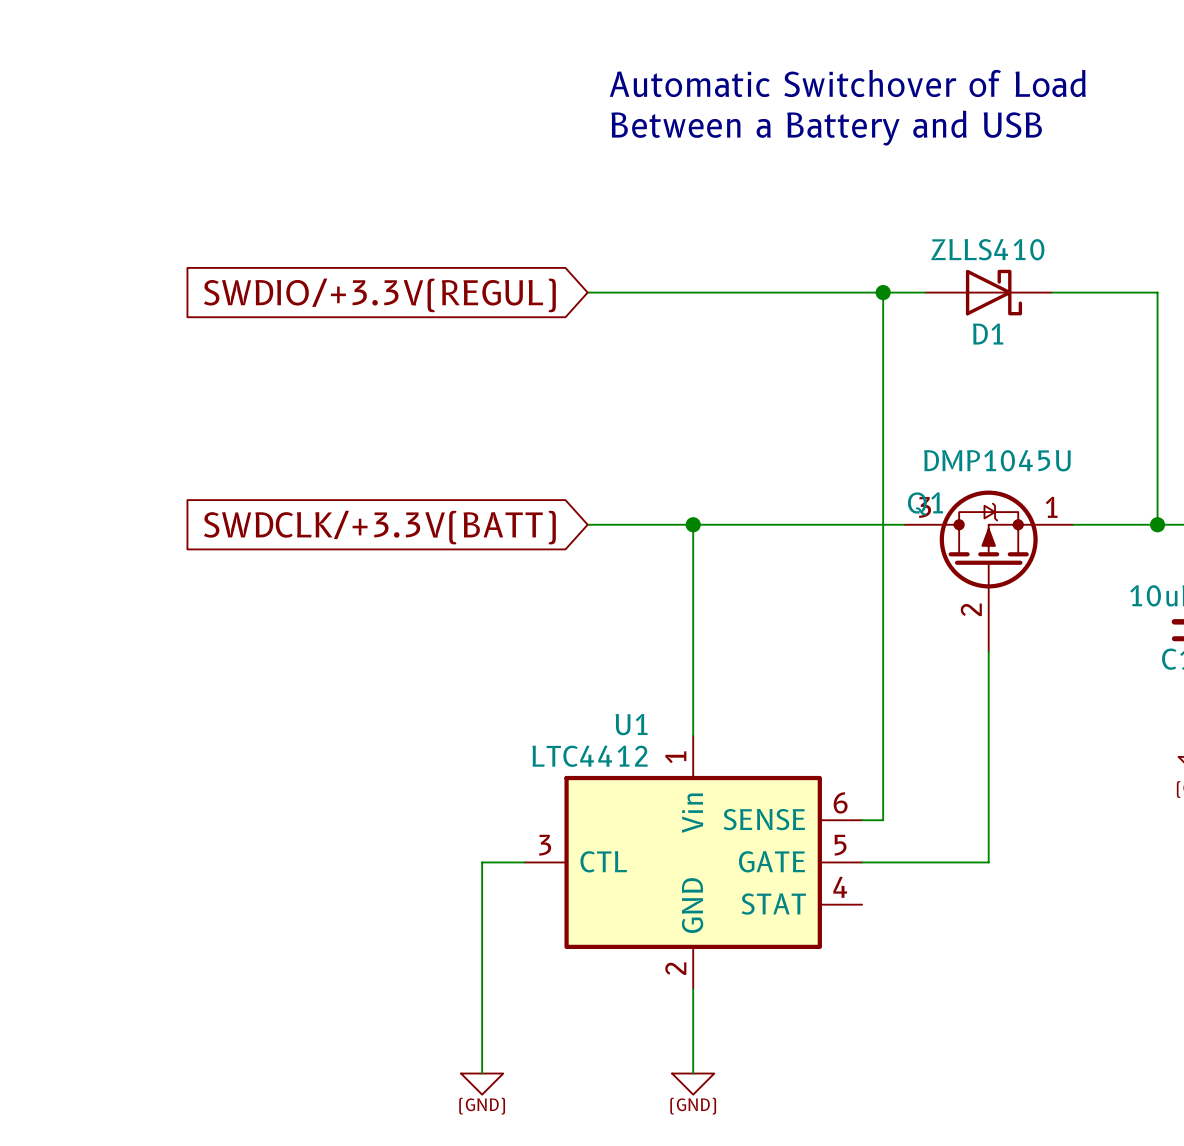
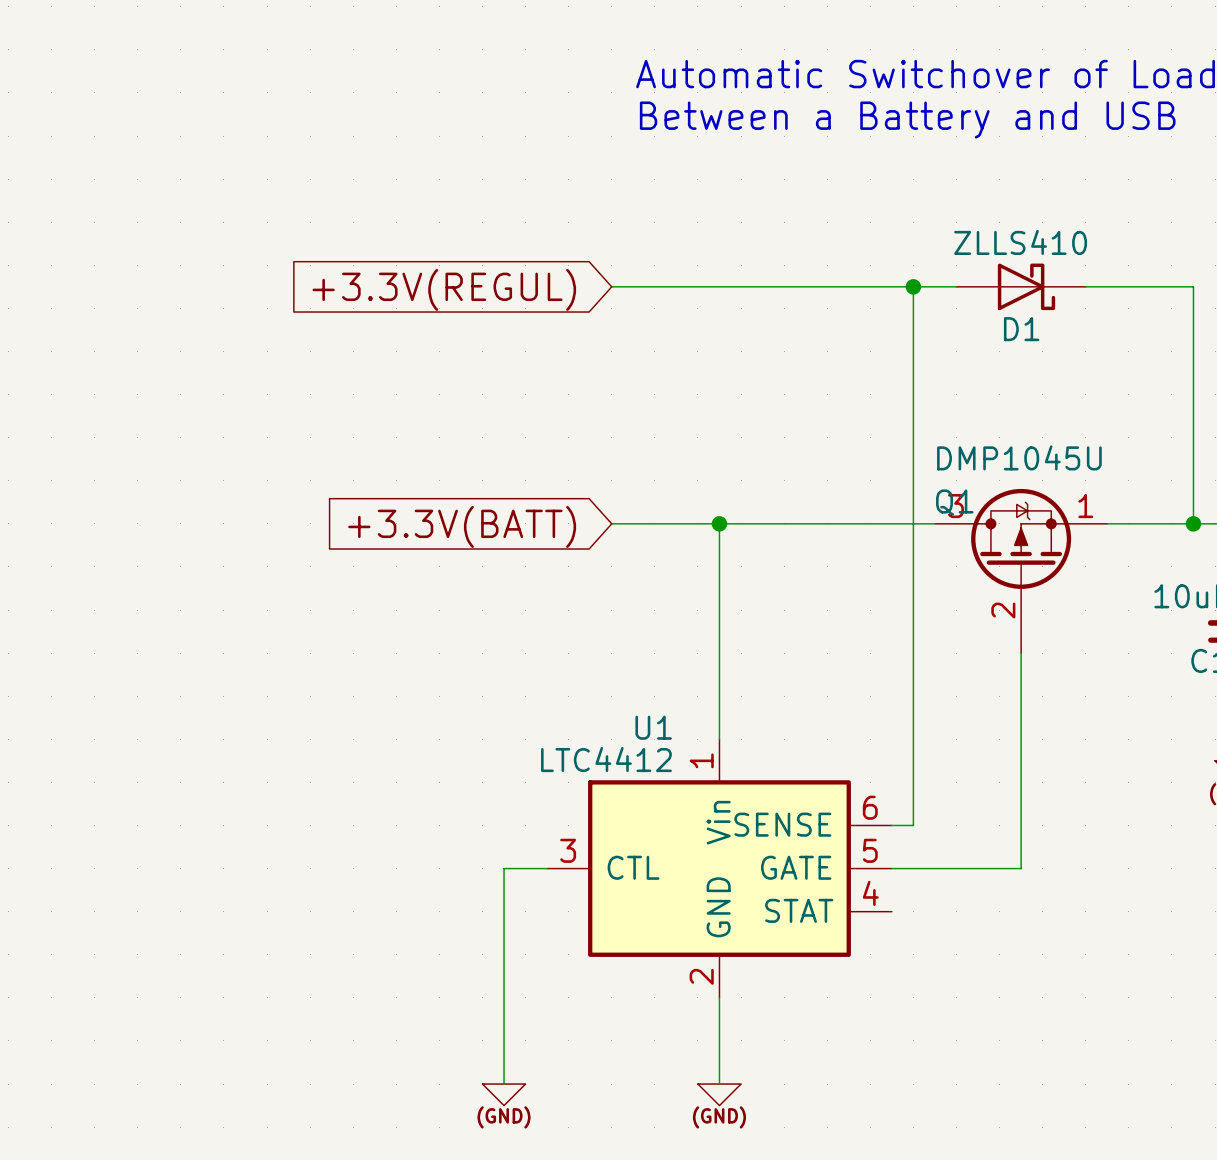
global label: SWDIO/+3.3V(REGUL) (379, 295) -> +3.3V(REGUL) (444, 289)
global label: SWDCLK/+3.3V(BATT) (379, 527) -> +3.3V(BATT) (462, 526)

